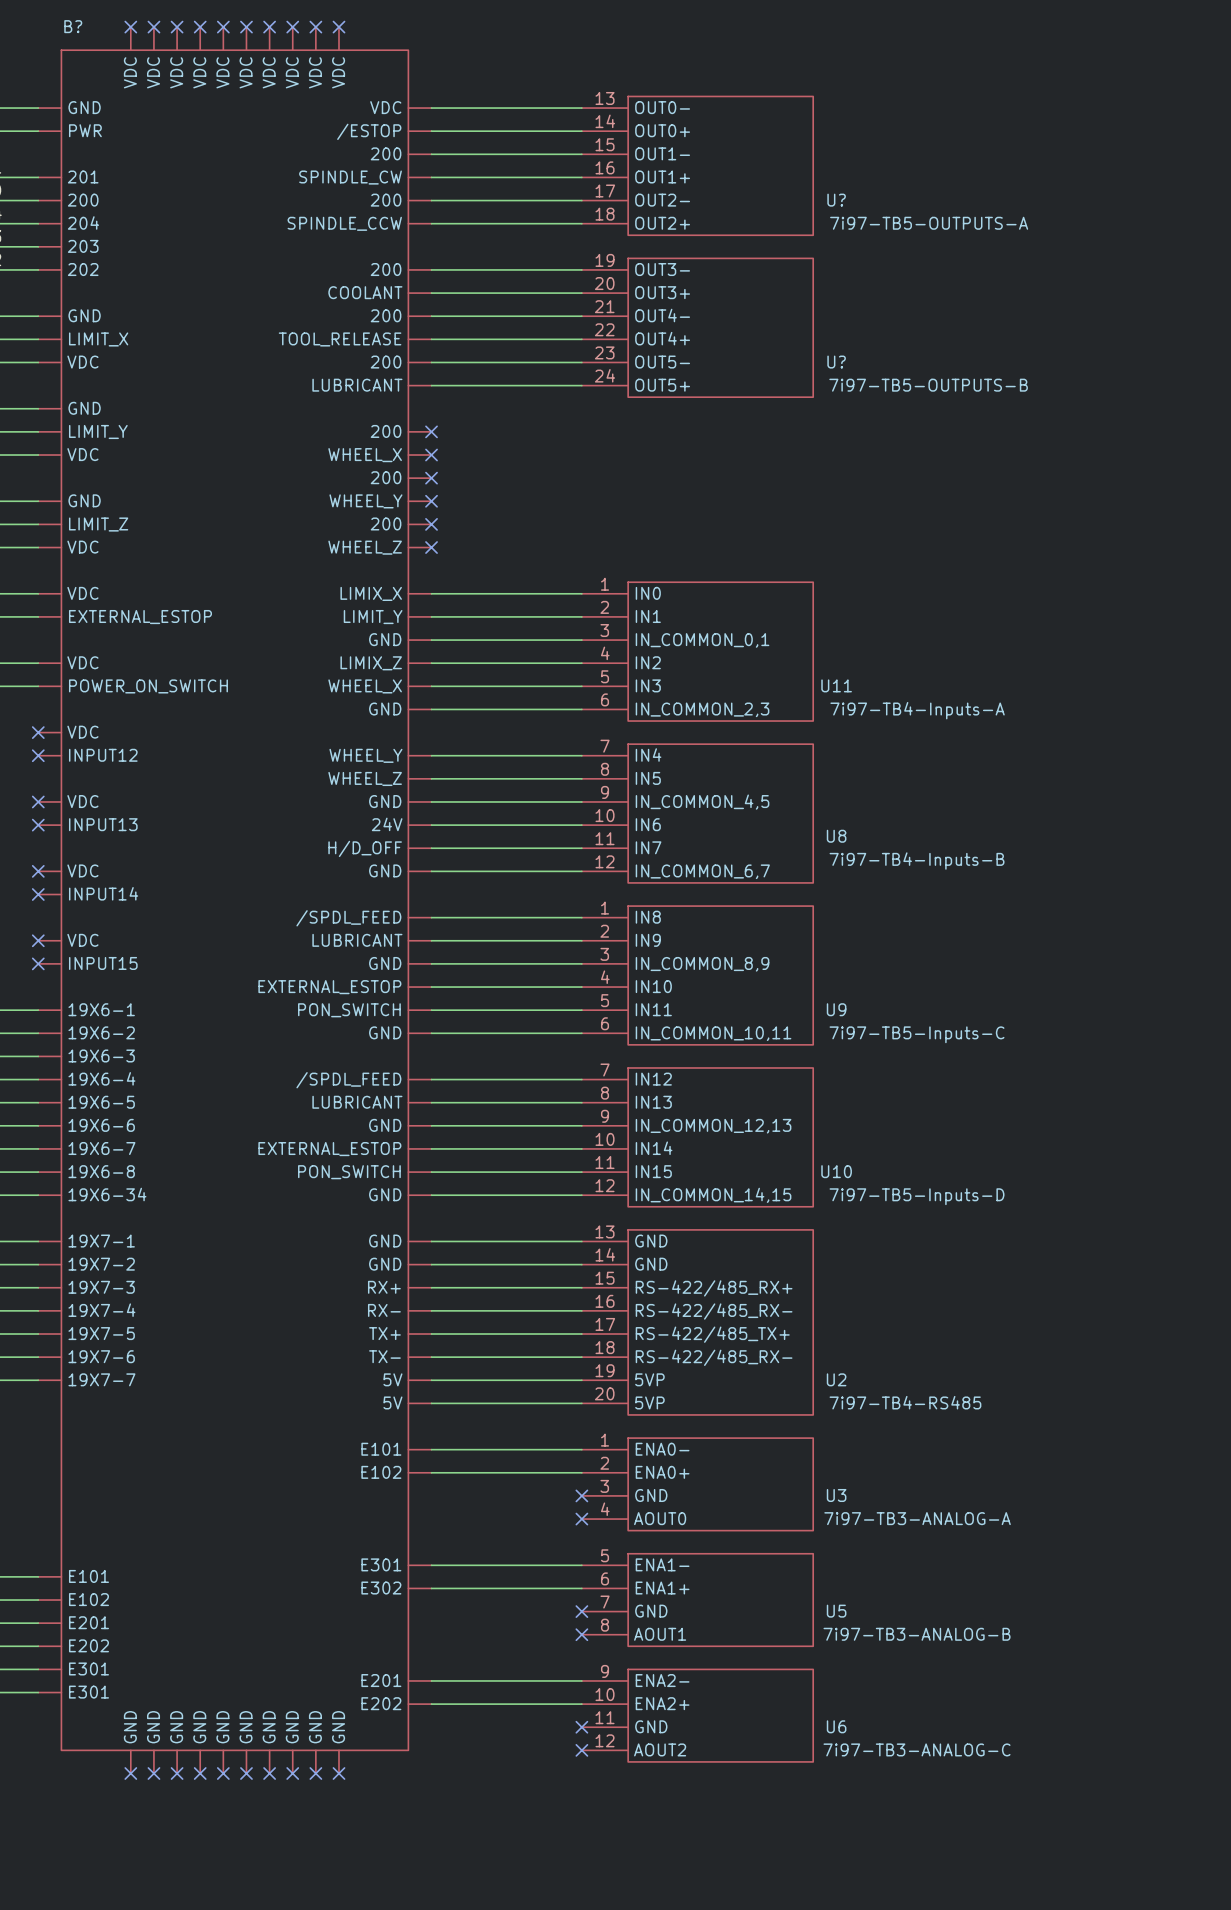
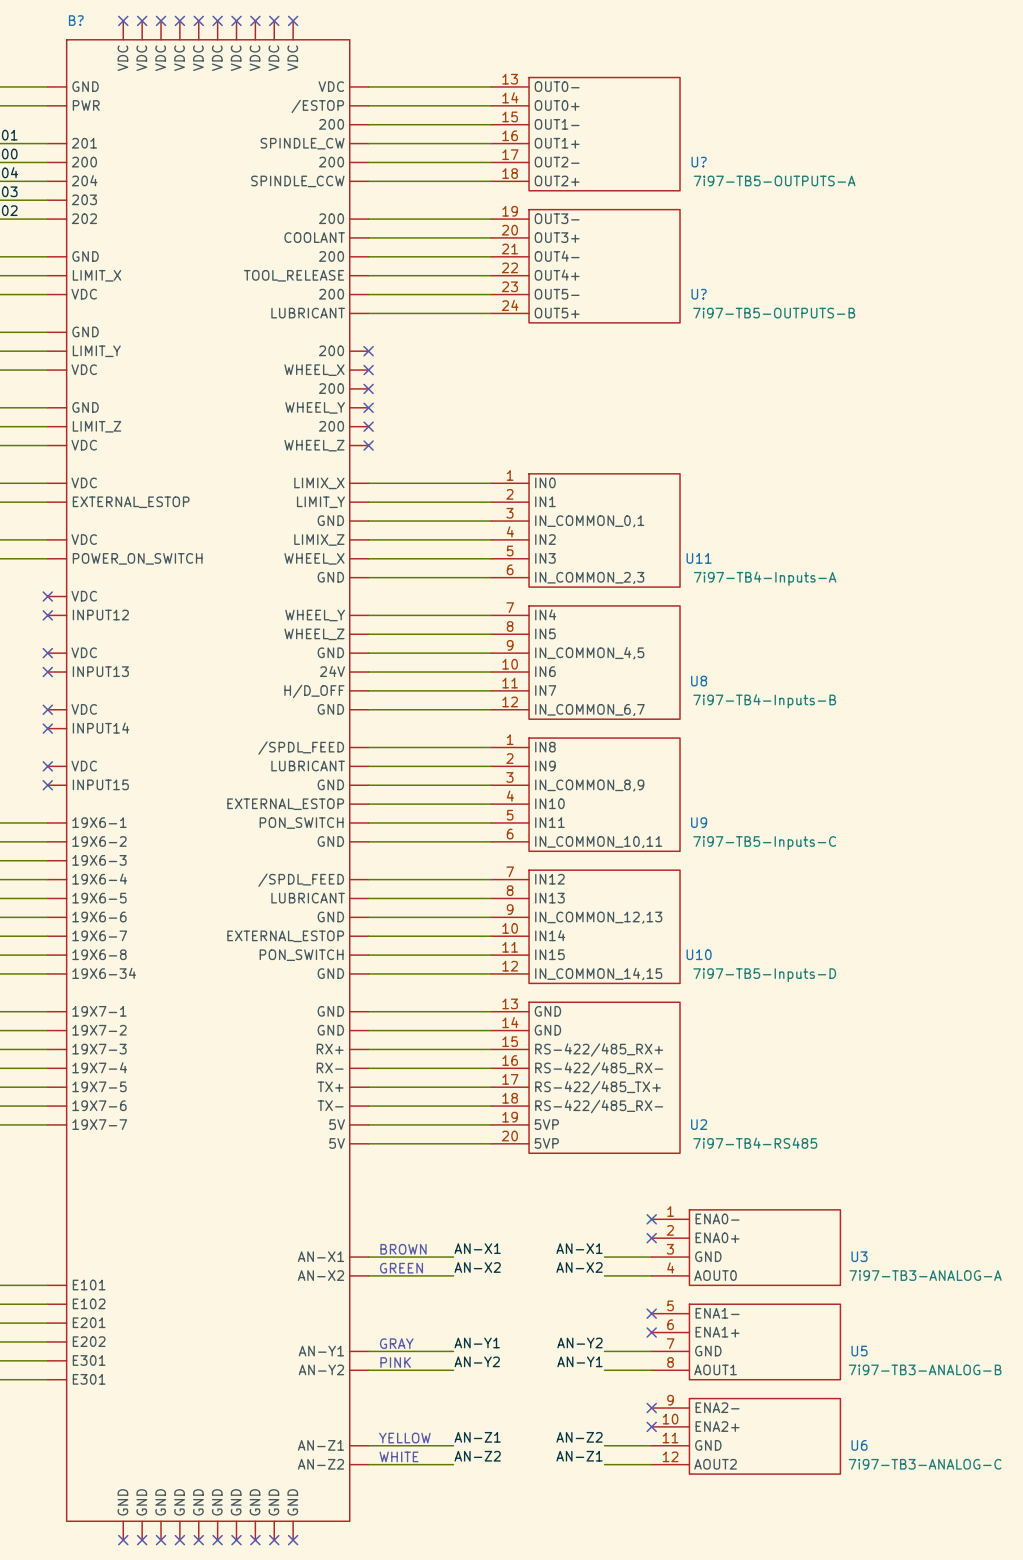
B?: (234, 900) -> none
B?: none -> (208, 780)
wire: (431, 1449) (581, 1449) -> none
wire: (431, 1472) (581, 1472) -> none
U3 position: (697, 1484) -> (746, 1247)
no-connect mark: (581, 1495) -> none
no-connect mark: none -> (651, 1219)
no-connect mark: (581, 1519) -> none
no-connect mark: none -> (651, 1238)
label: none -> AN-X1 (477, 1248)
label: none -> AN-X1 (579, 1248)
text: none -> BROWN (403, 1249)
wire: none -> (368, 1257) (453, 1257)
wire: none -> (604, 1257) (651, 1257)
text: none -> GREEN (401, 1268)
label: none -> AN-X2 (477, 1267)
label: none -> AN-X2 (579, 1267)
wire: (535, 1565) (581, 1565) -> none
wire: none -> (604, 1275) (651, 1275)
wire: (431, 1588) (581, 1588) -> none
U5 position: (697, 1600) -> (746, 1341)
no-connect mark: (581, 1611) -> none
no-connect mark: none -> (651, 1313)
no-connect mark: (581, 1634) -> none
no-connect mark: none -> (651, 1332)
label: none -> AN-Y1 (477, 1342)
label: none -> AN-Y2 (579, 1342)
text: none -> GRAY (396, 1343)
wire: none -> (368, 1351) (453, 1351)
wire: none -> (604, 1351) (651, 1351)
label: none -> AN-Y2 (477, 1361)
label: none -> AN-Y1 (579, 1361)
text: none -> PINK (395, 1362)
wire: (535, 1680) (581, 1680) -> none
wire: none -> (604, 1370) (651, 1370)
wire: (431, 1704) (581, 1704) -> none
U6 position: (697, 1715) -> (746, 1436)
no-connect mark: (581, 1727) -> none
no-connect mark: none -> (651, 1408)
no-connect mark: (581, 1750) -> none
no-connect mark: none -> (651, 1426)
label: none -> AN-Z1 (477, 1437)
label: none -> AN-Z2 (579, 1437)
text: none -> YELLOW (404, 1438)
no-connect mark: (130, 1773) -> none
no-connect mark: (153, 1773) -> none
no-connect mark: (177, 1773) -> none
no-connect mark: (200, 1773) -> none
no-connect mark: (223, 1773) -> none
no-connect mark: (246, 1773) -> none
no-connect mark: (269, 1773) -> none
no-connect mark: (292, 1773) -> none
no-connect mark: (315, 1773) -> none
no-connect mark: (338, 1773) -> none
wire: none -> (368, 1445) (453, 1445)
wire: none -> (604, 1445) (651, 1445)
label: none -> AN-Z2 (477, 1456)
label: none -> AN-Z1 (579, 1456)
text: none -> WHITE (399, 1456)
wire: none -> (368, 1464) (453, 1464)
wire: none -> (604, 1464) (651, 1464)
no-connect mark: none -> (123, 1540)
no-connect mark: none -> (142, 1540)
no-connect mark: none -> (161, 1540)
no-connect mark: none -> (179, 1540)
no-connect mark: none -> (198, 1540)
no-connect mark: none -> (217, 1540)
no-connect mark: none -> (236, 1540)
no-connect mark: none -> (255, 1540)
no-connect mark: none -> (274, 1540)
no-connect mark: none -> (293, 1540)

